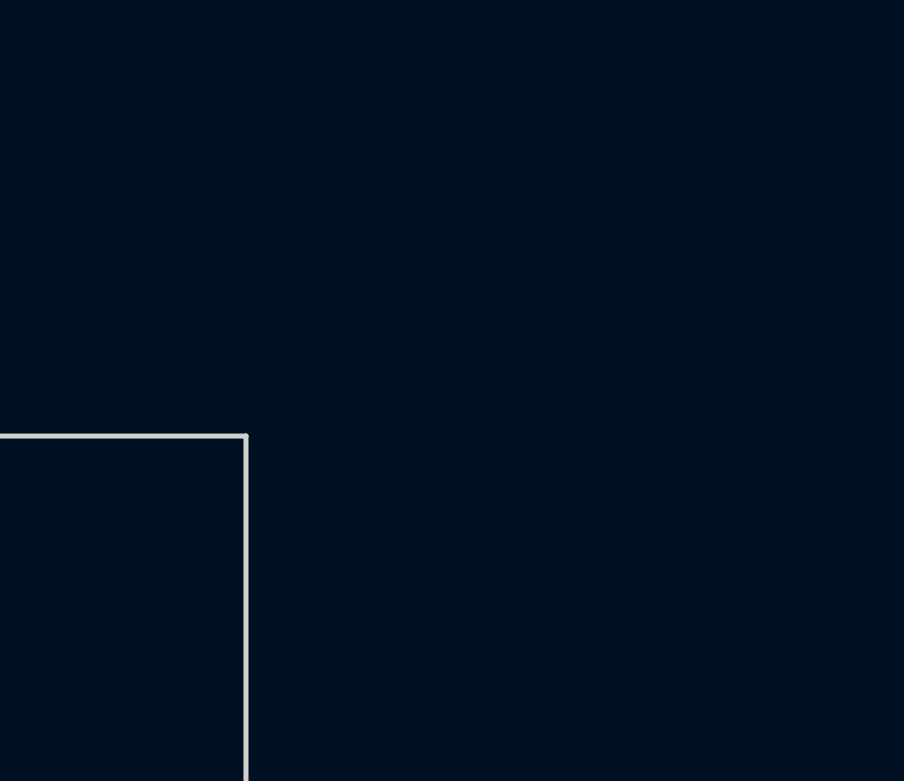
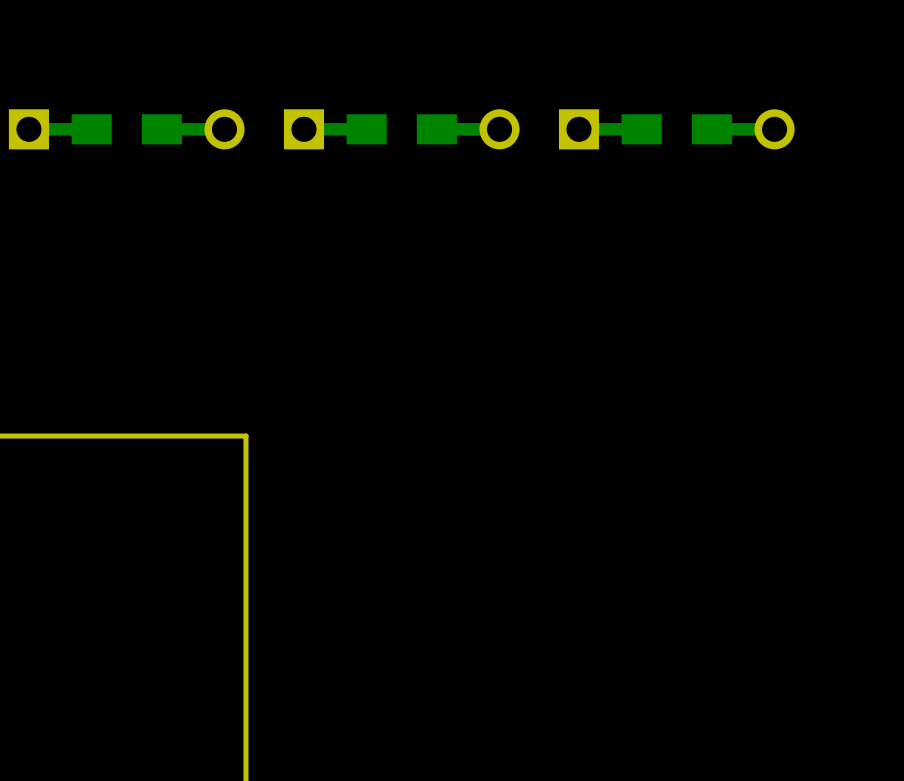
part: none -> (126, 129)
part: none -> (401, 129)
part: none -> (676, 129)

